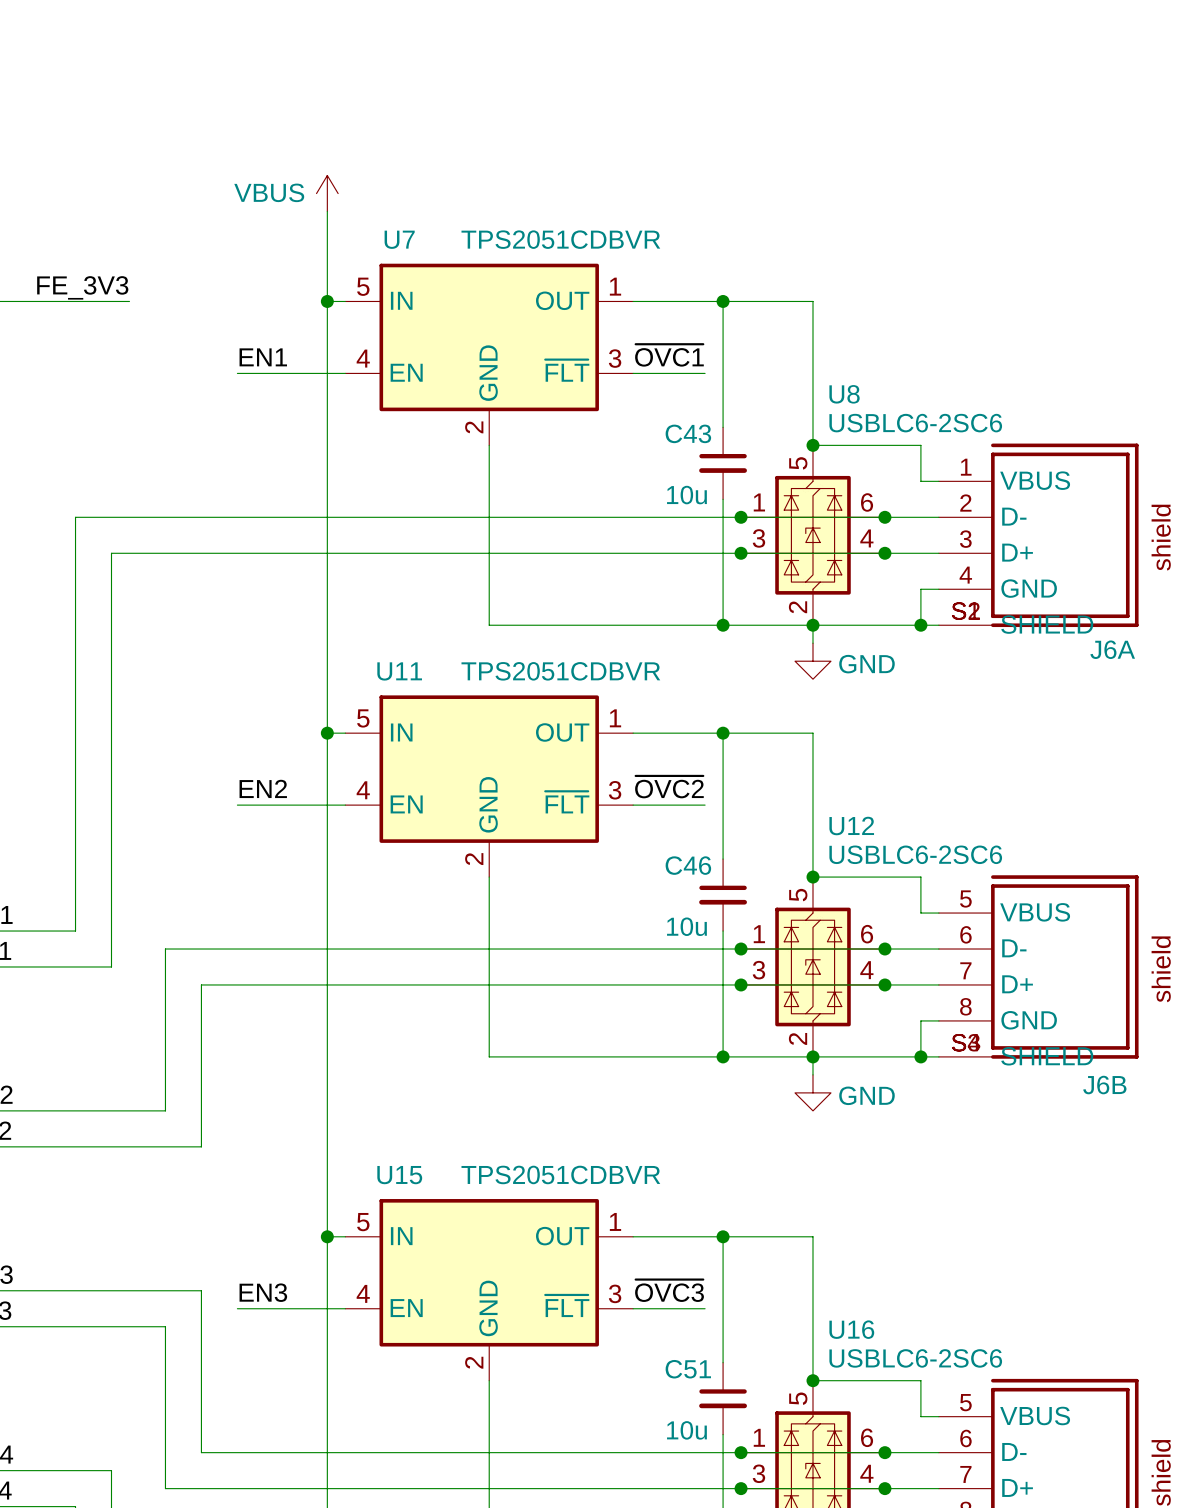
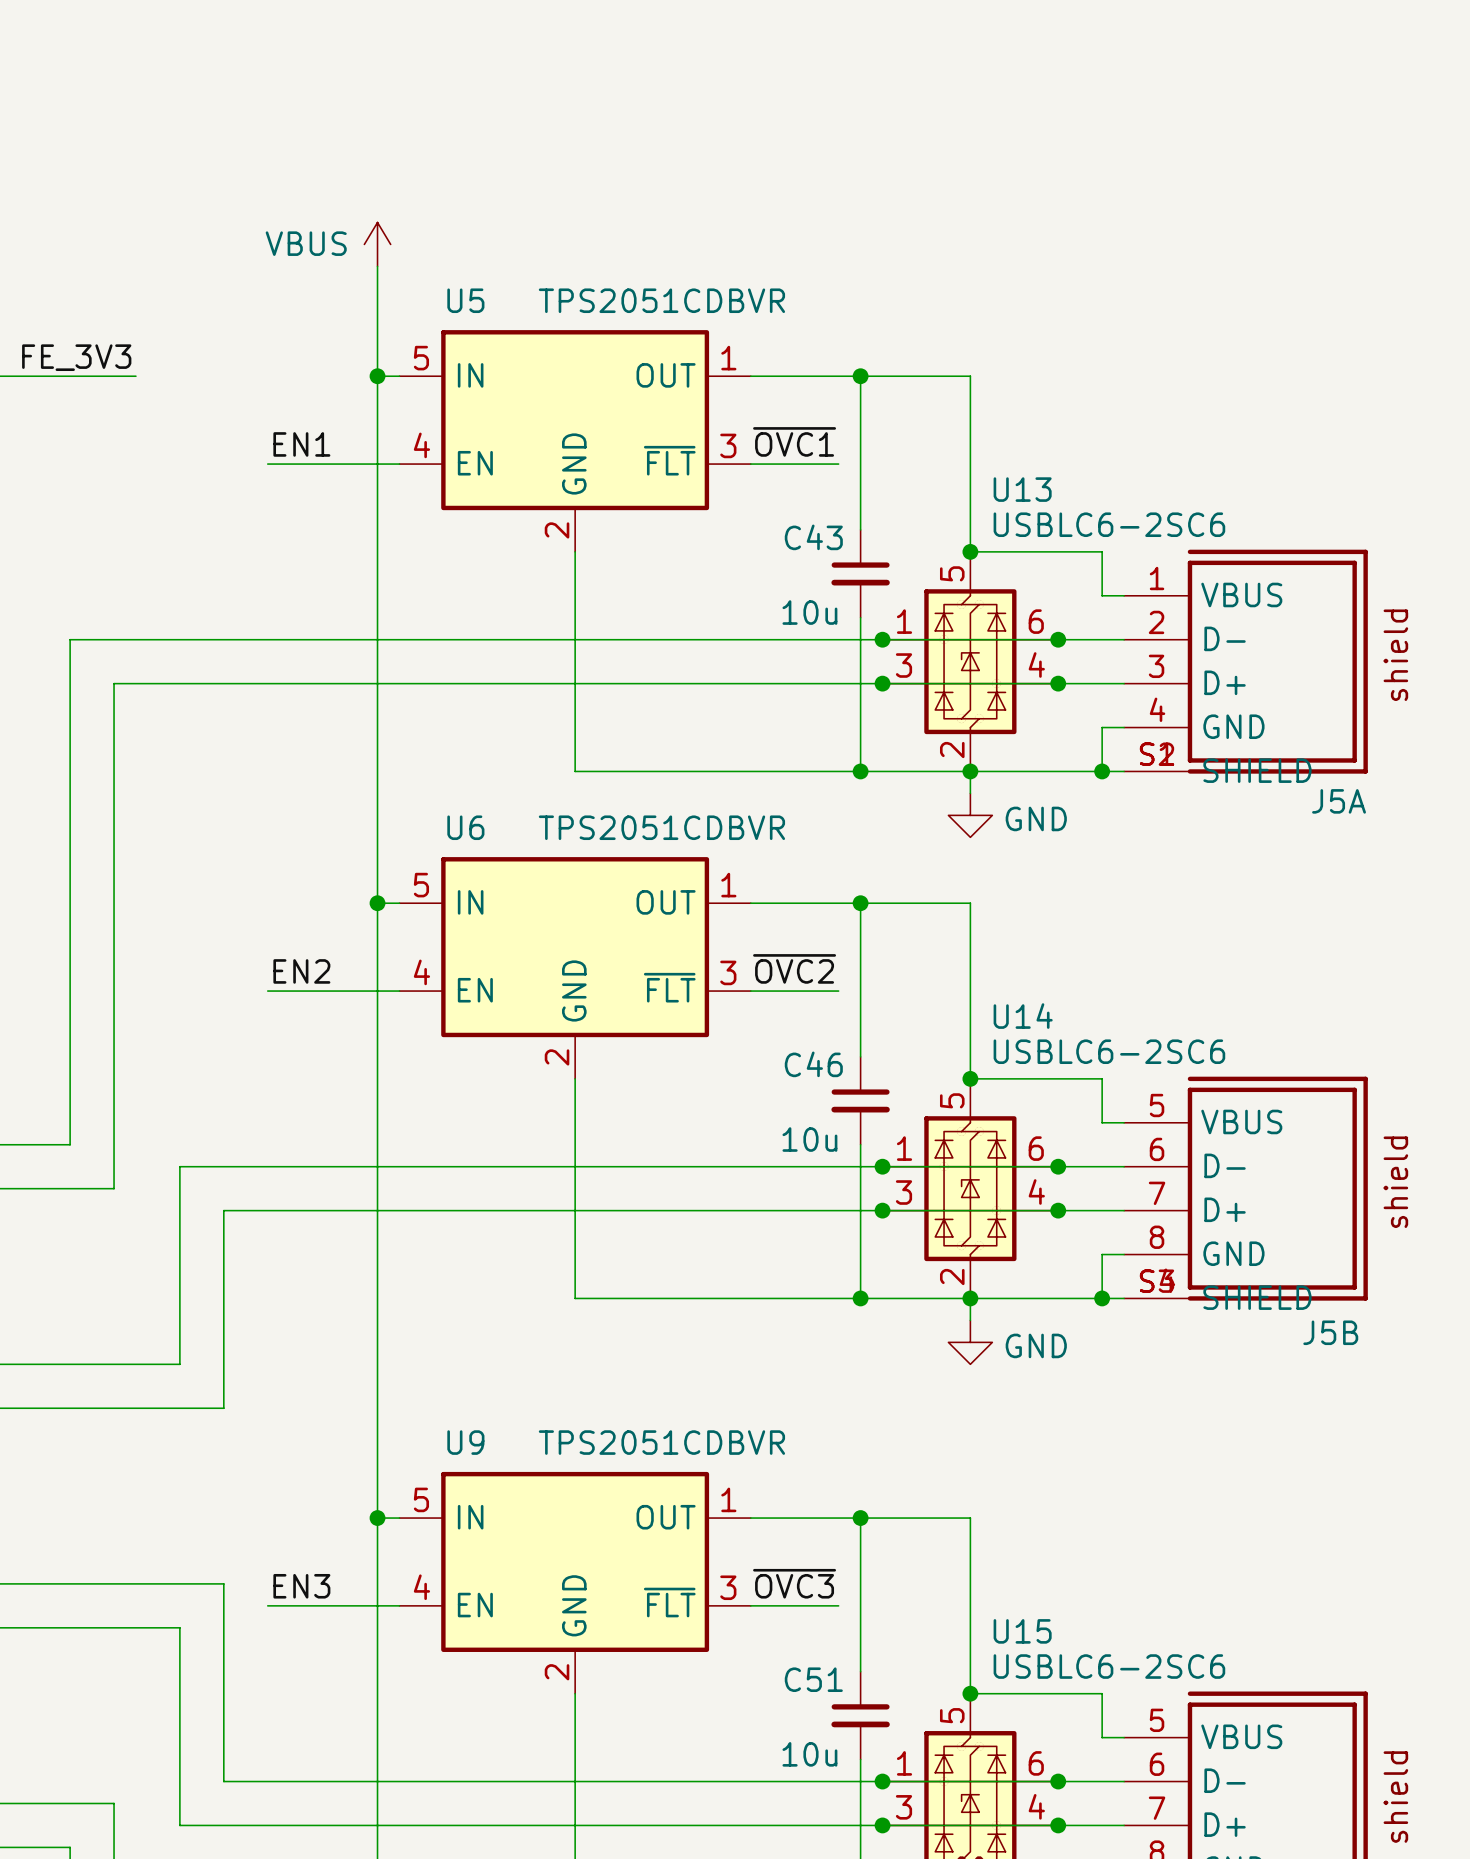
U7 name: U7 (399, 239) -> U5 (465, 300)
U8 name: U8 (844, 394) -> U13 (1022, 489)
J6A name: J6A (1112, 649) -> J5A (1339, 801)
U11 name: U11 (399, 671) -> U6 (465, 827)
U12 name: U12 (851, 826) -> U14 (1023, 1016)
J6B name: J6B (1104, 1085) -> J5B (1330, 1332)
U15 name: U15 (399, 1175) -> U9 (465, 1442)
U16 name: U16 (851, 1329) -> U15 (1022, 1631)

